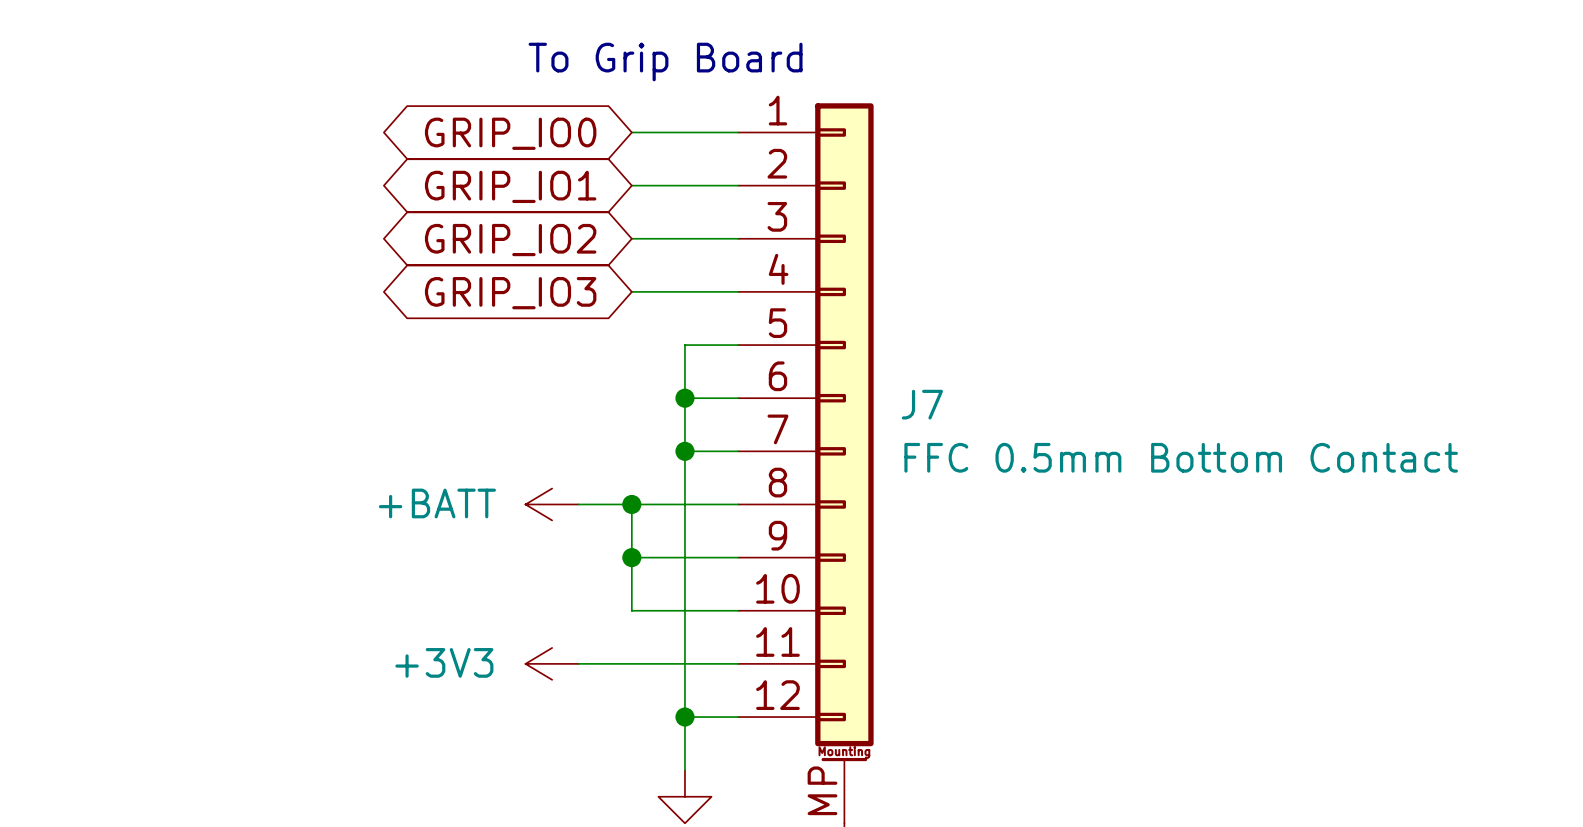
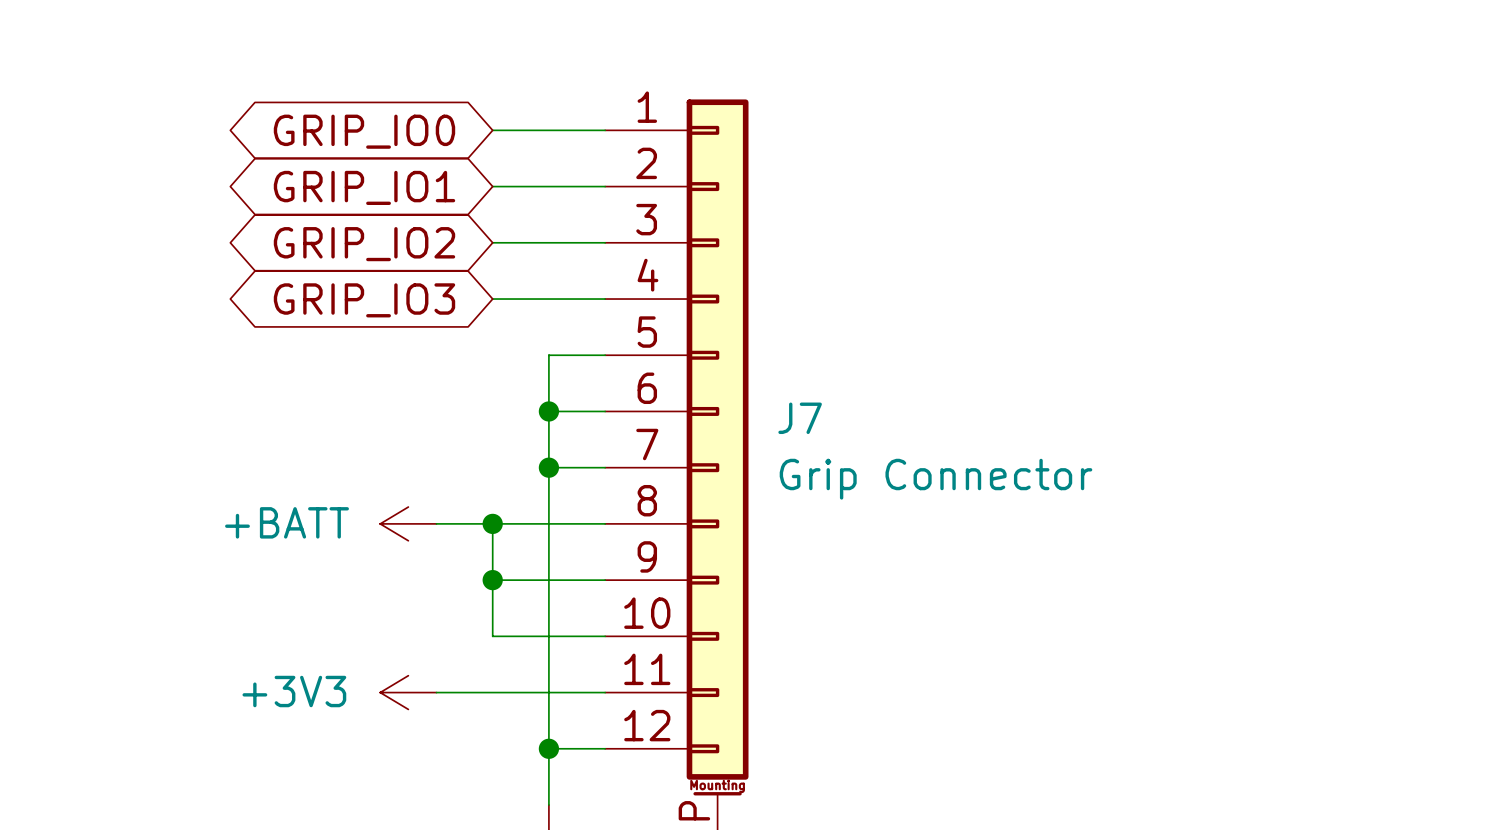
text: To Grip Board (665, 62) -> none
J7 value: FFC 0.5mm Bottom Contact (1181, 457) -> Grip Connector (935, 479)

